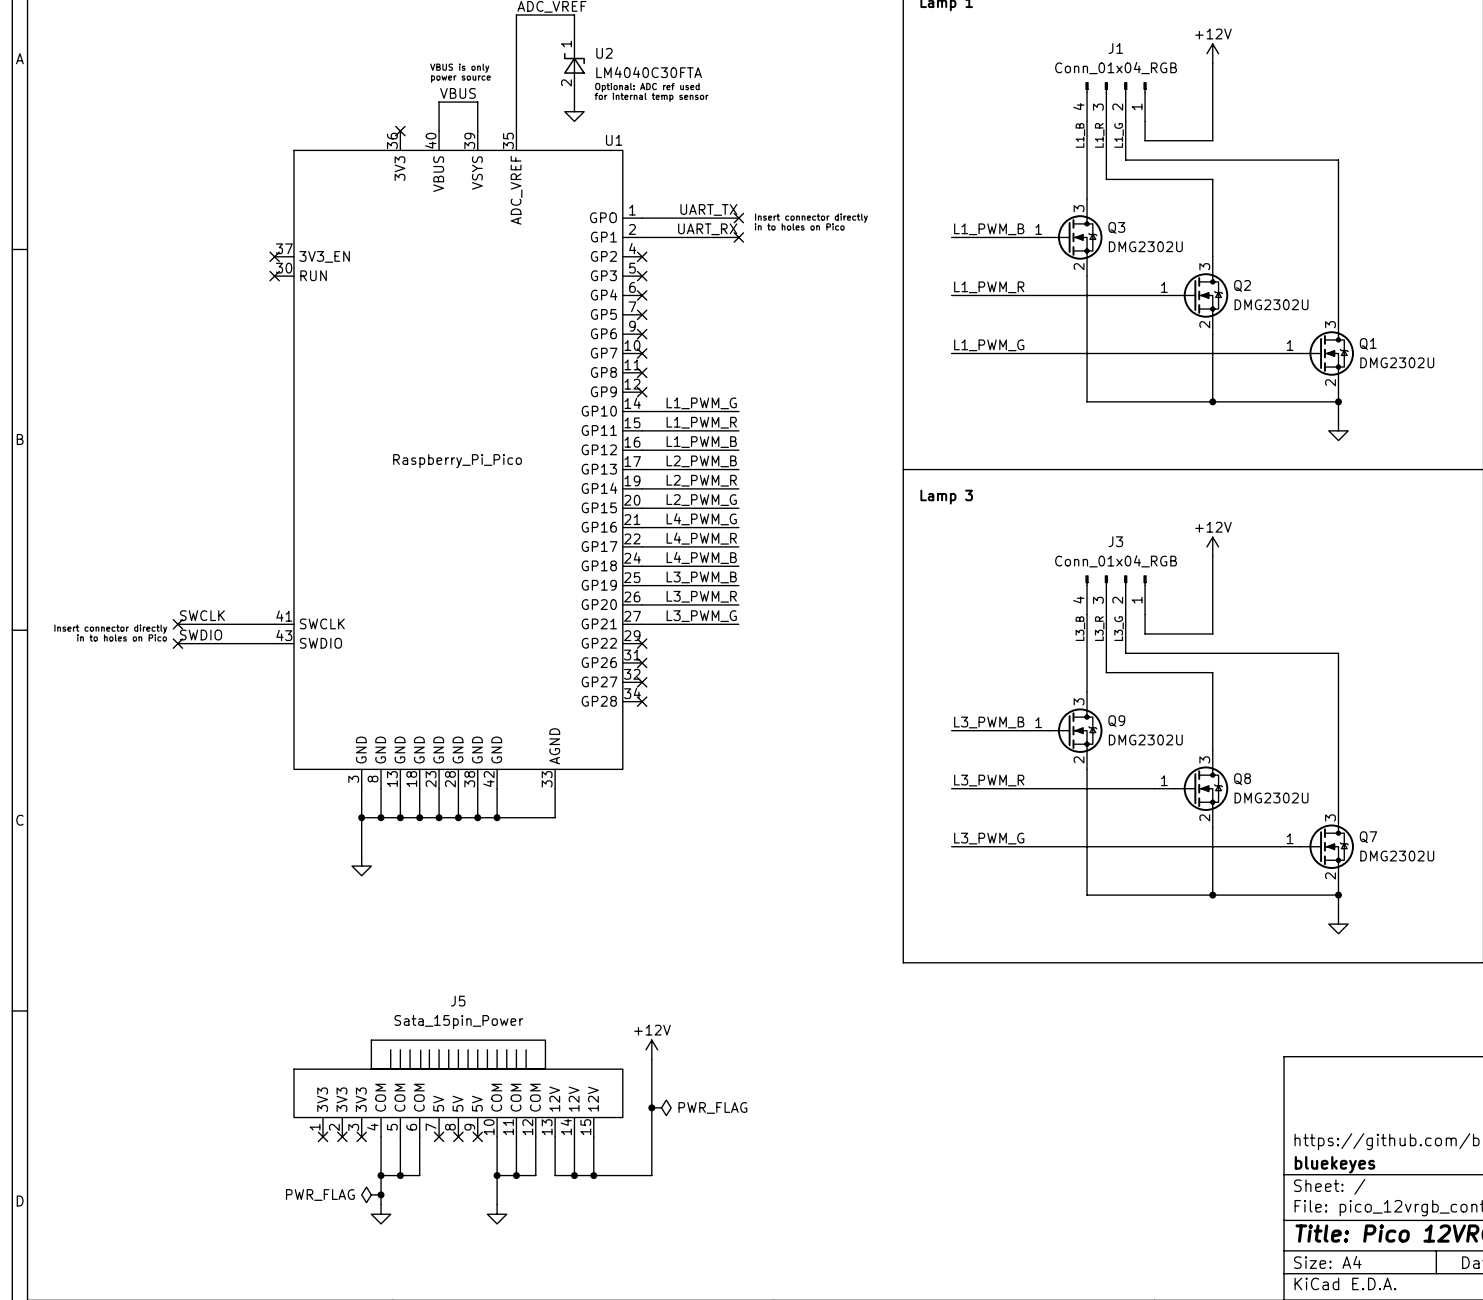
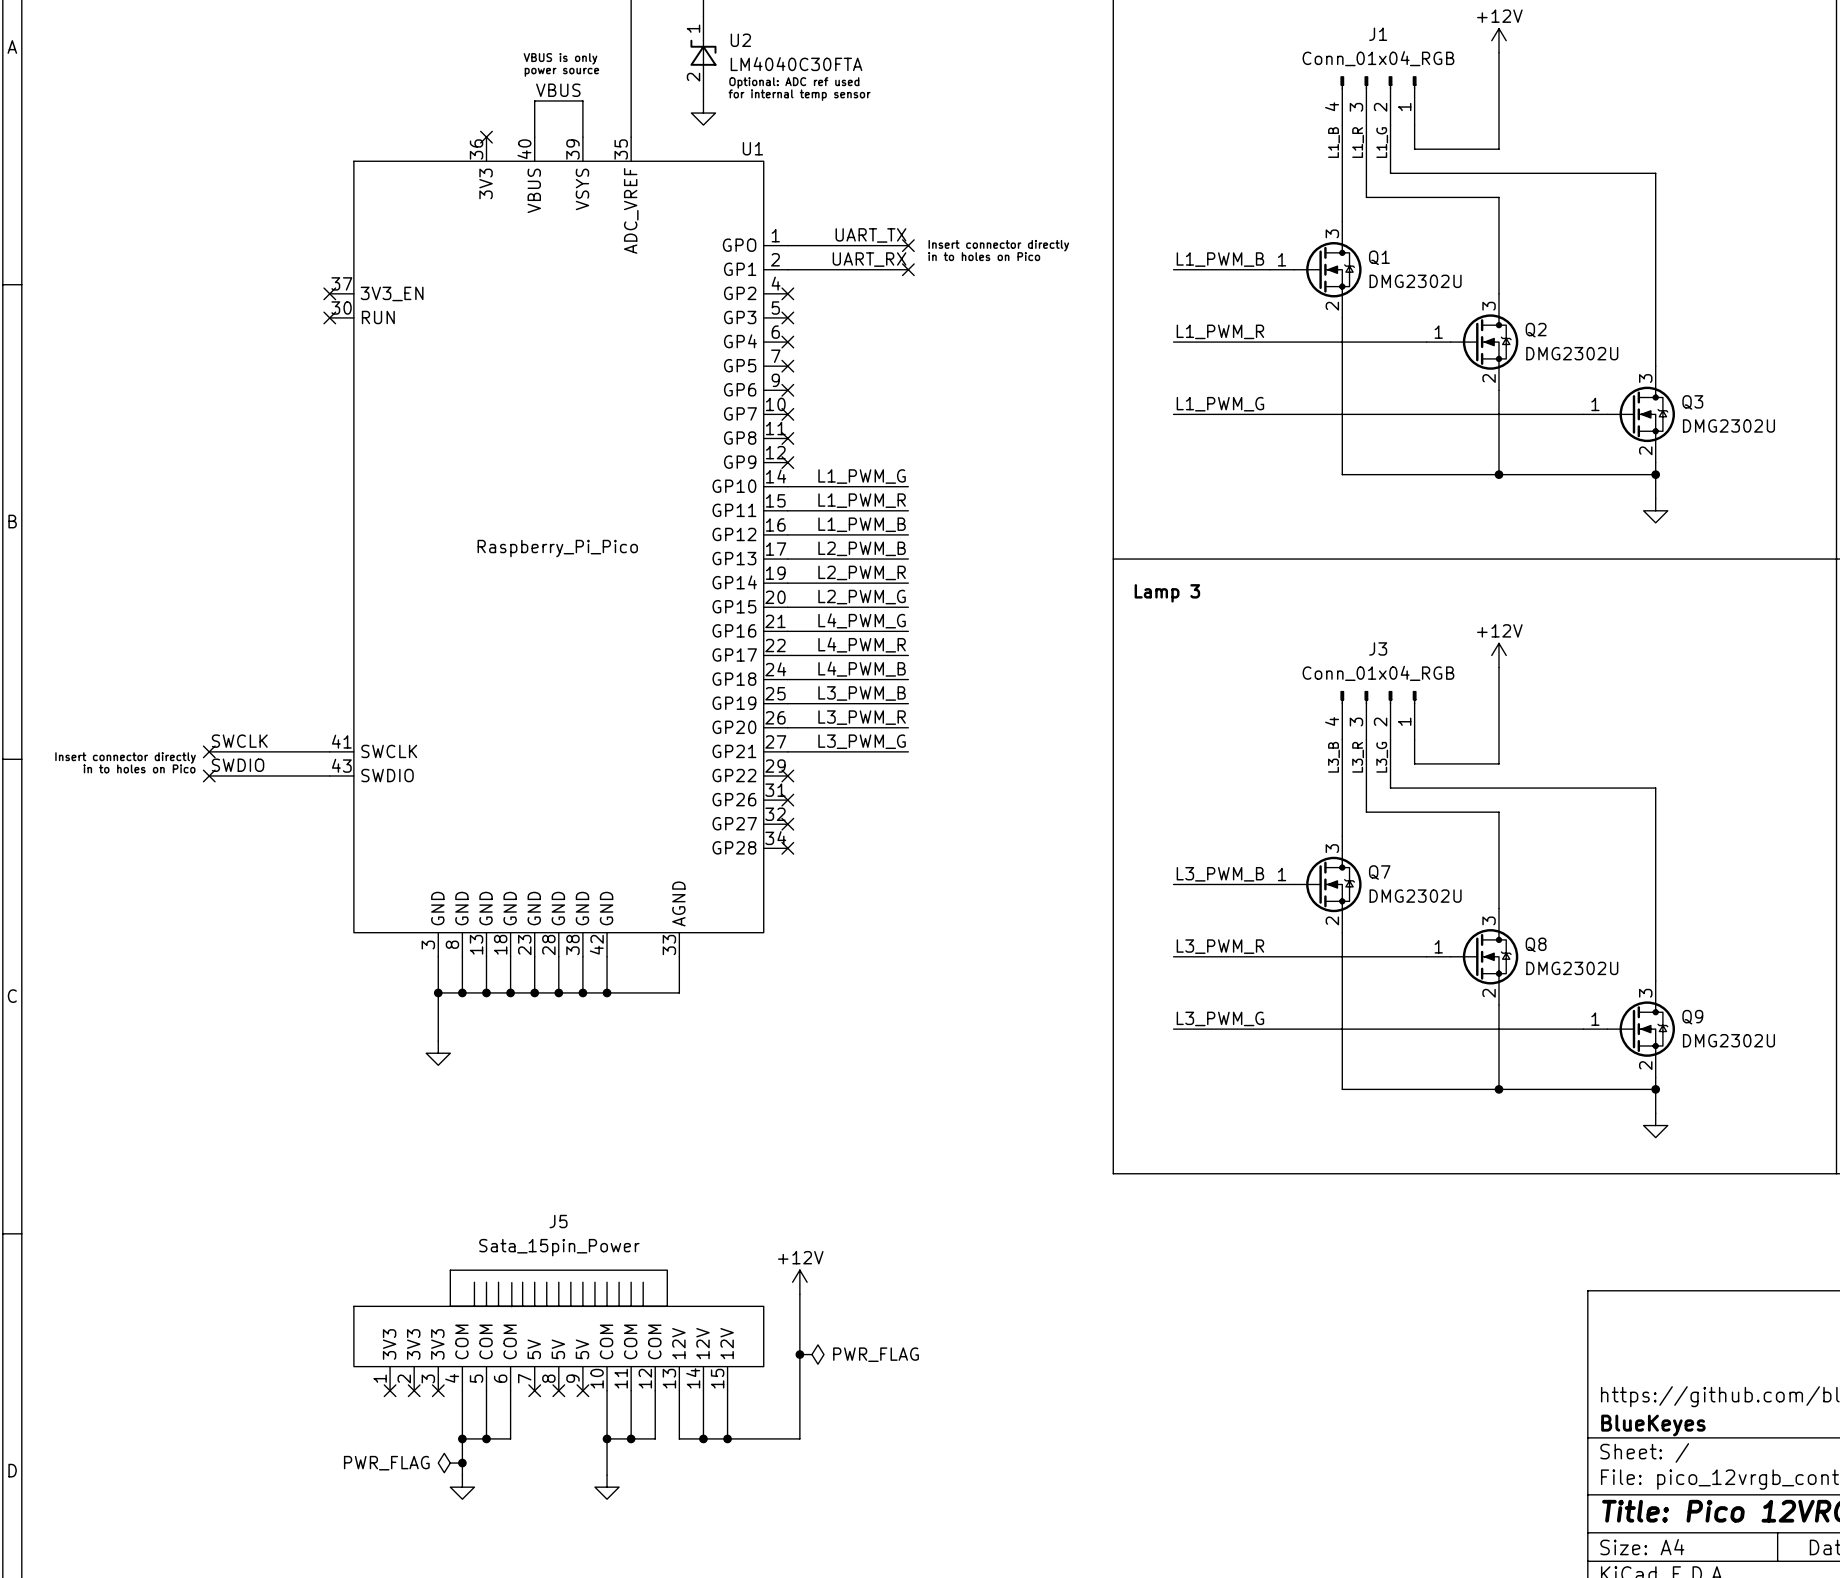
Q3 name: Q3 (1116, 227) -> Q1 (1379, 257)
Q1 name: Q1 (1368, 343) -> Q3 (1692, 402)
Q9 name: Q9 (1116, 721) -> Q7 (1379, 872)
Q7 name: Q7 (1368, 837) -> Q9 (1692, 1017)
title block: bluekeyes (1335, 1164) -> BlueKeyes (1653, 1425)

